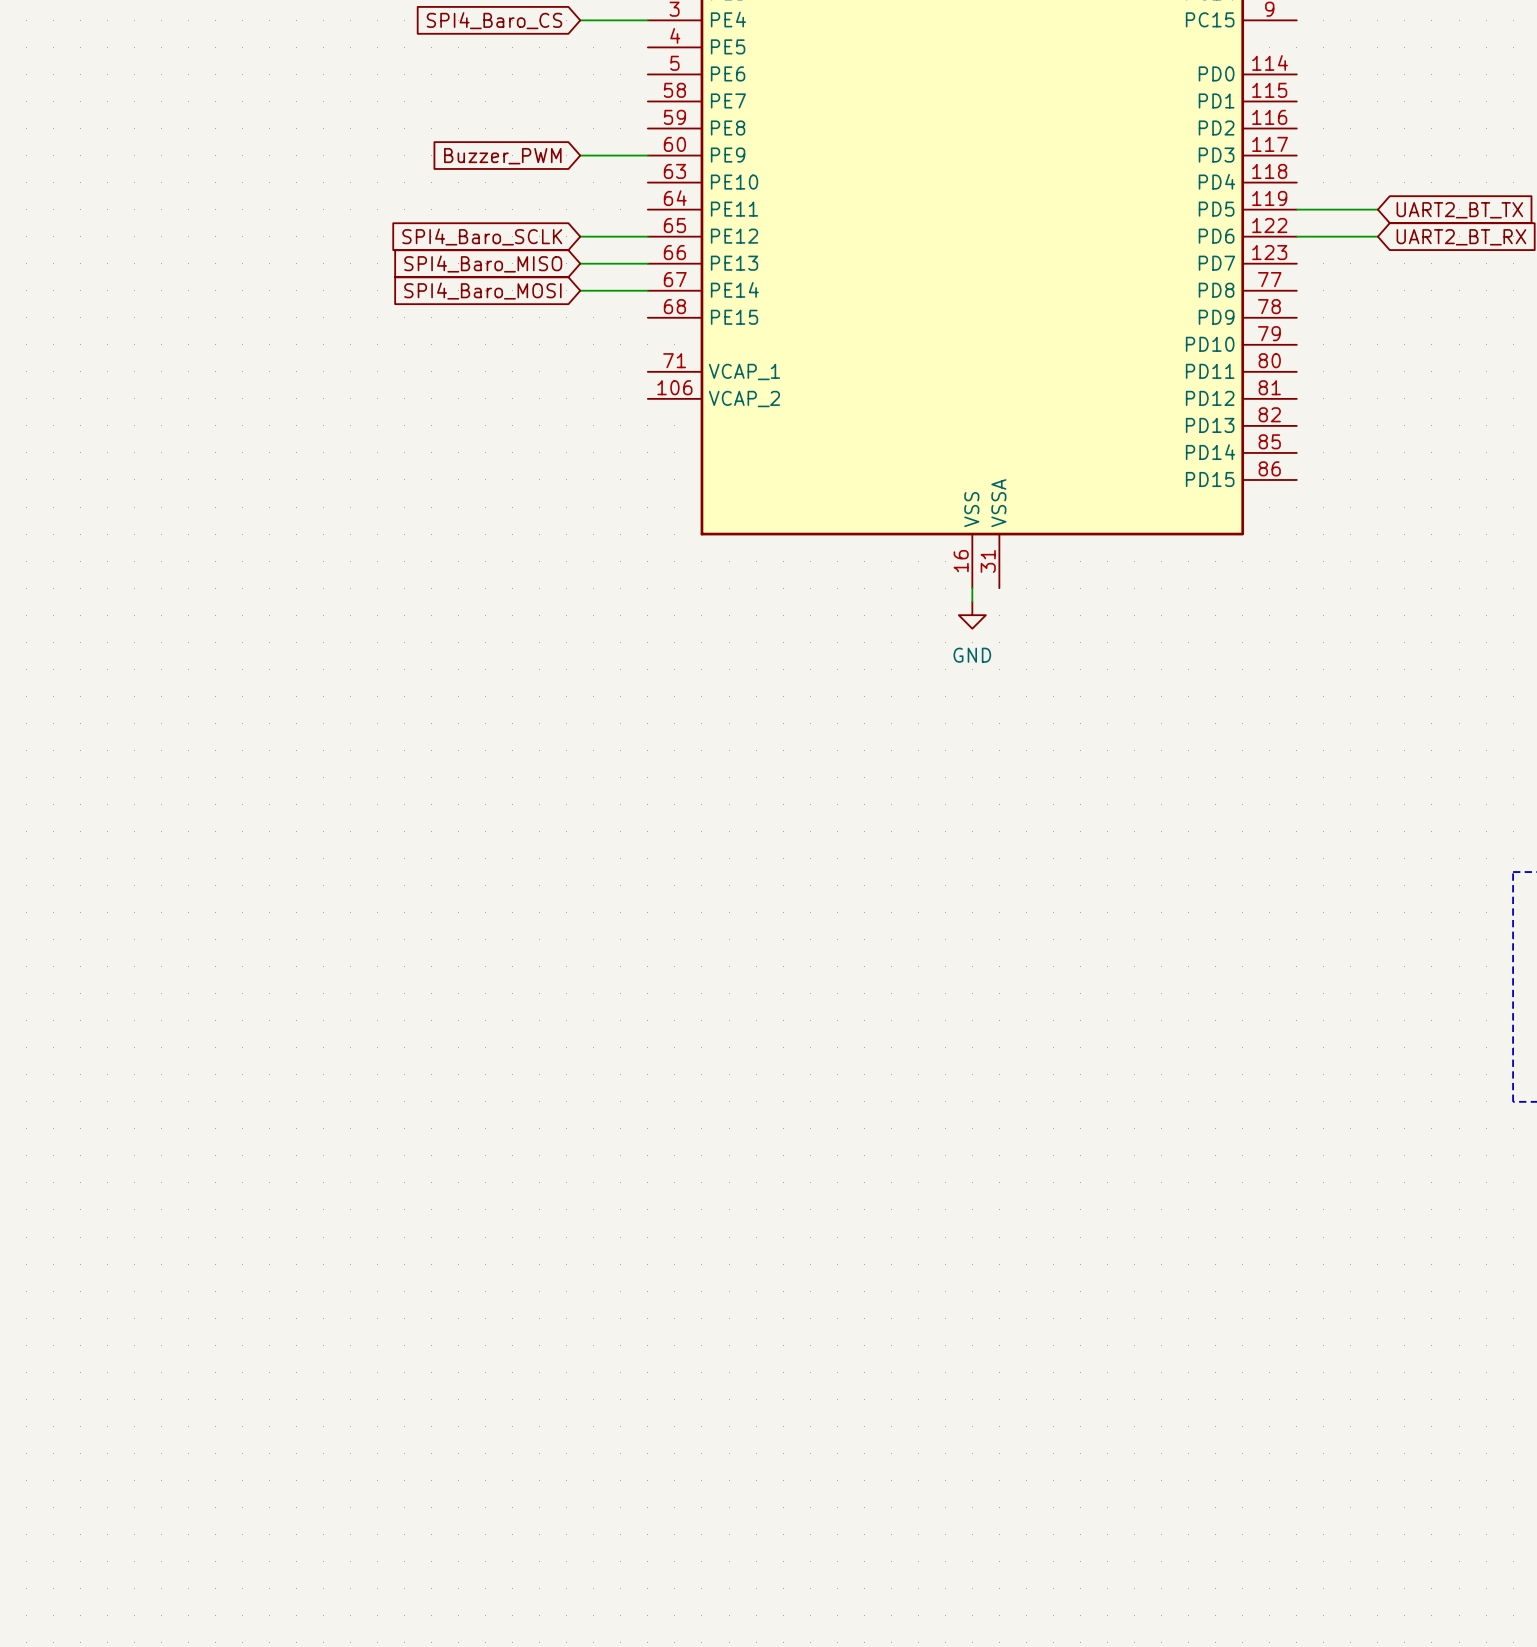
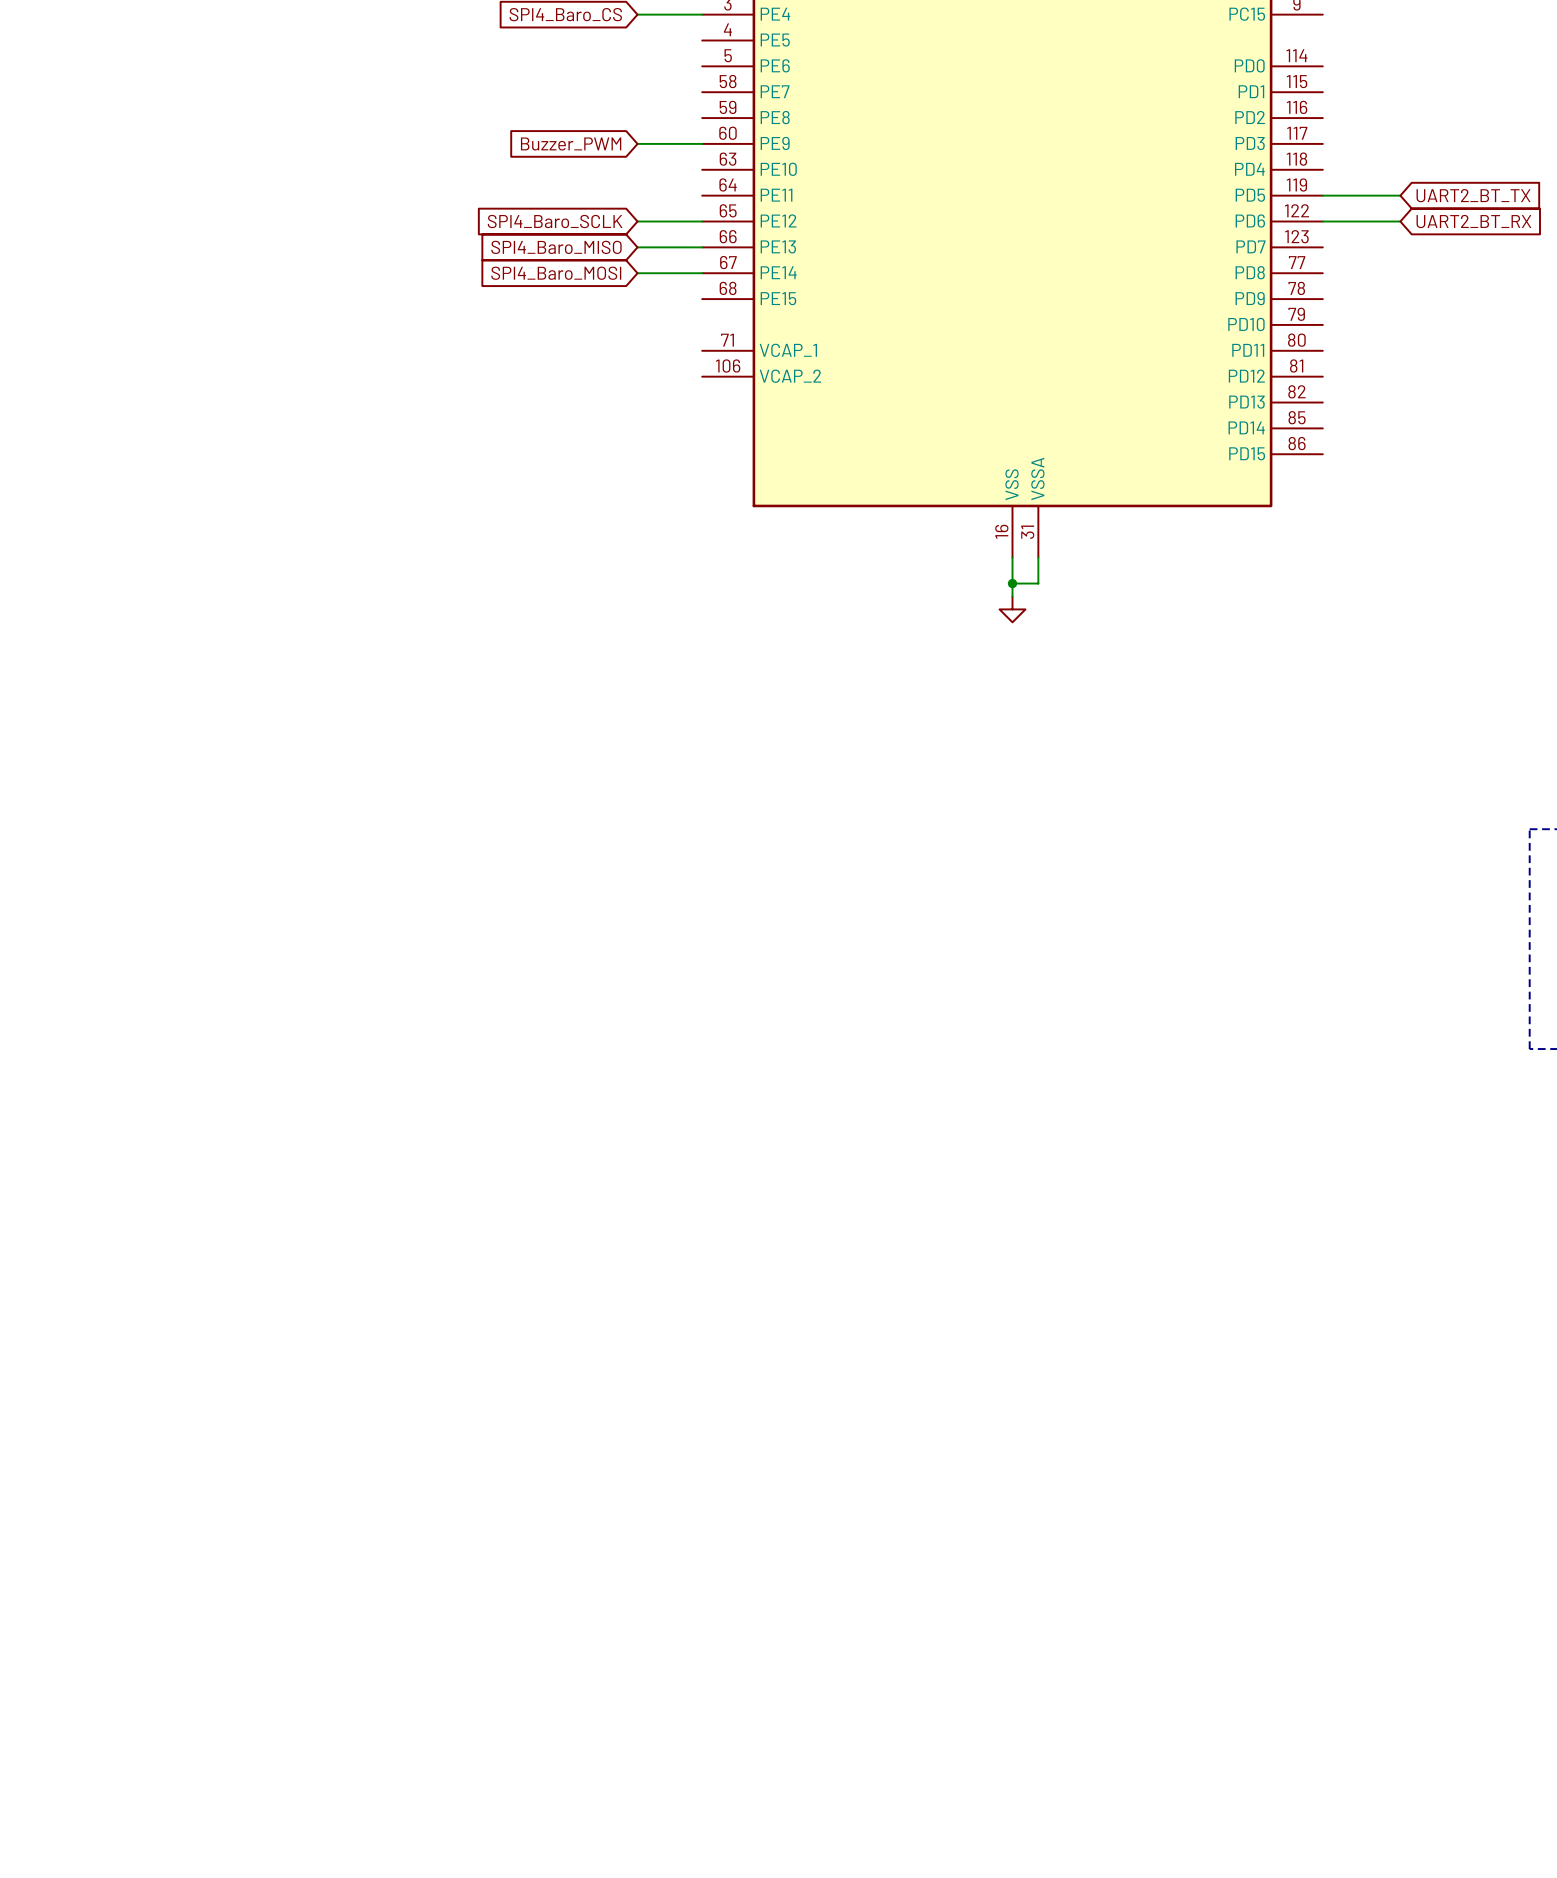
wire: none -> (1038, 557) (1038, 583) (1012, 583)
power symbol: GND (972, 615) -> none
junction: none -> (1012, 583)
power symbol: none -> (1012, 609)

